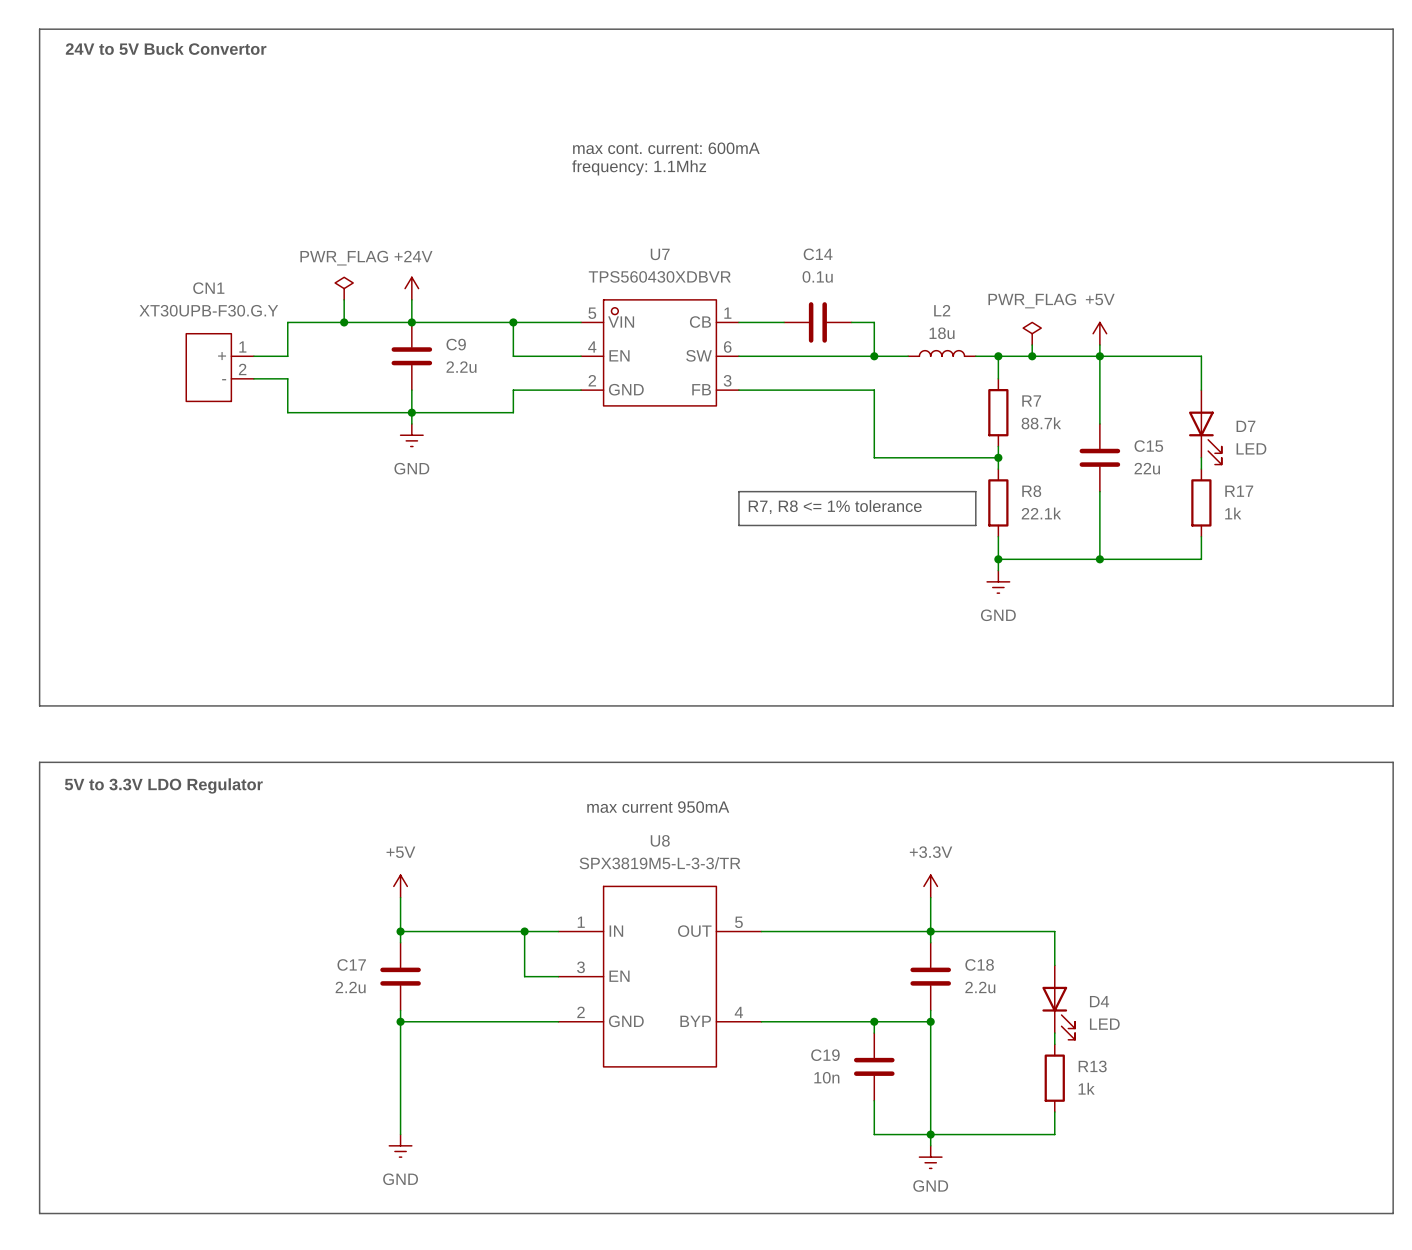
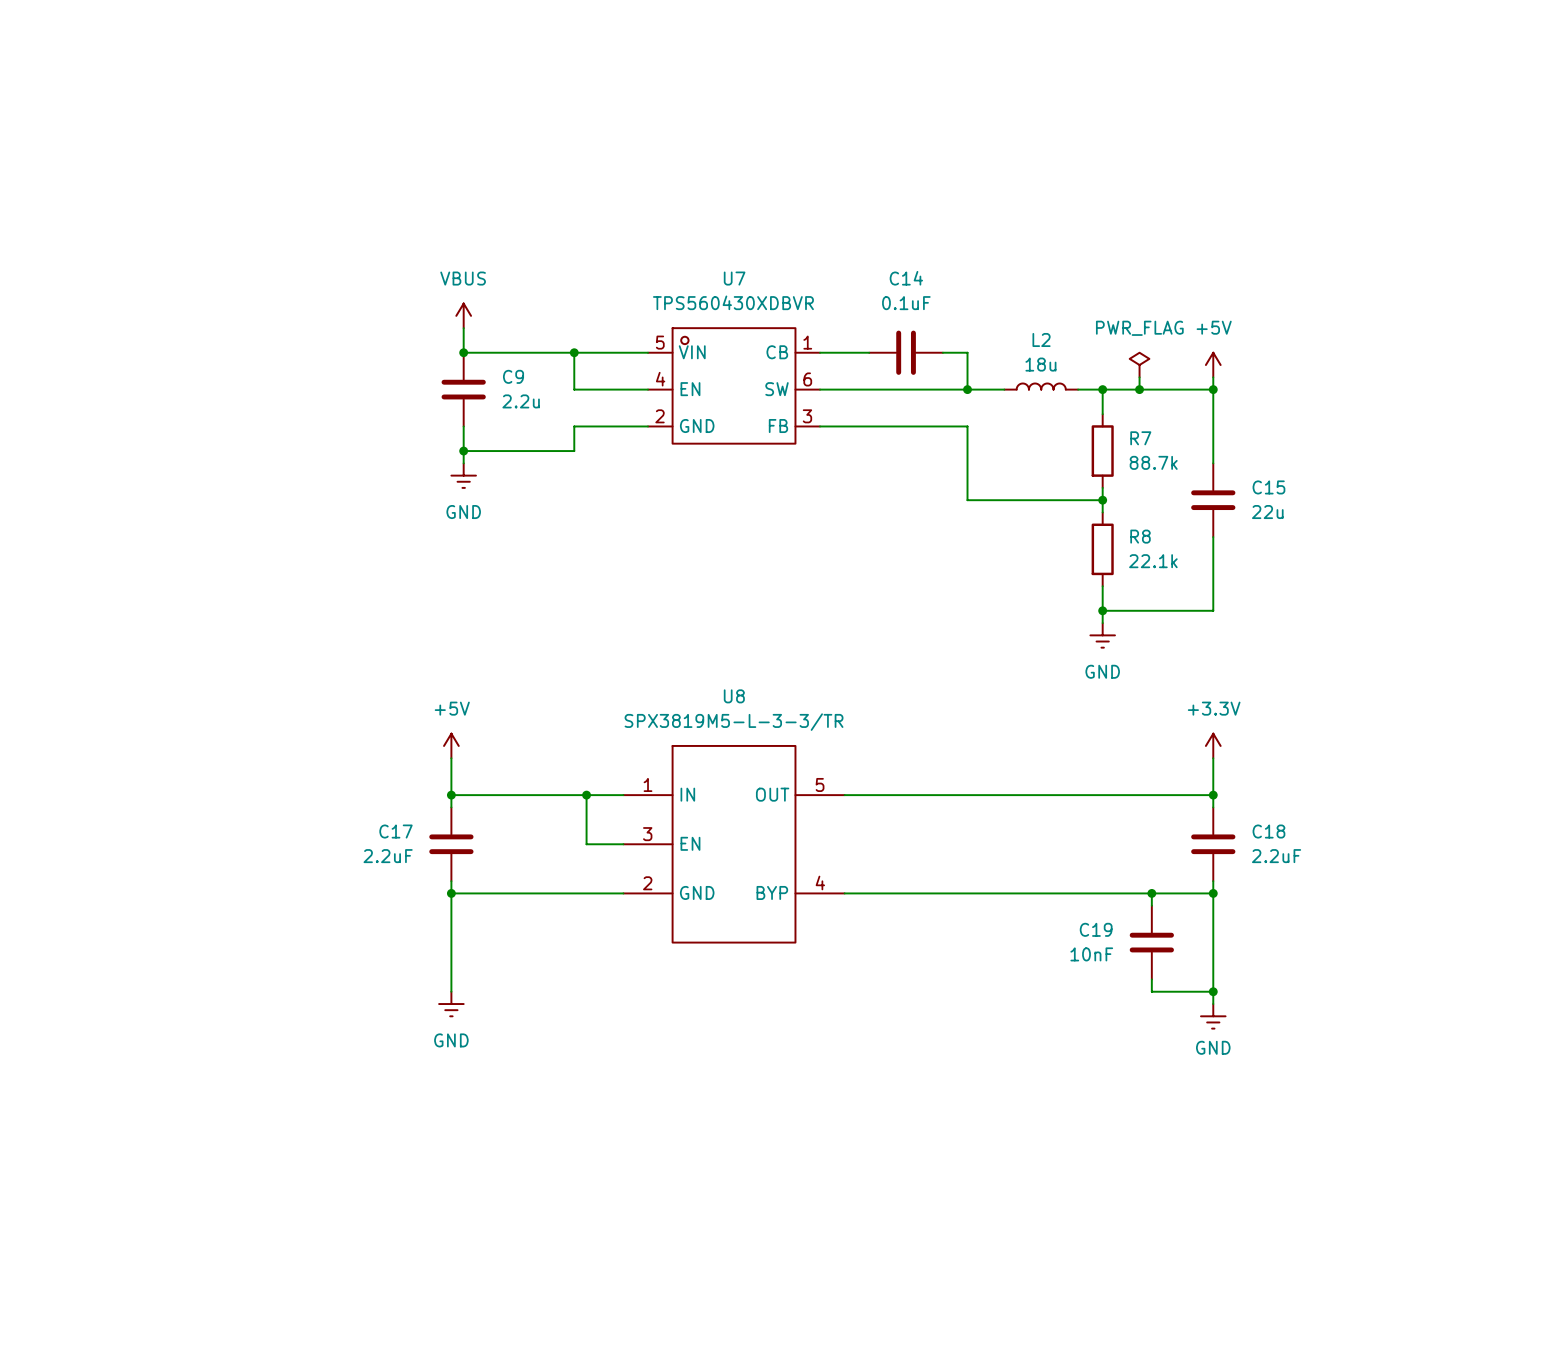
line: (39, 29) (1393, 29) (1393, 705) (39, 705) (39, 29) -> none
text: 24V to 5V Buck Convertor (166, 48) -> none
text: max cont. current: 600mA (666, 148) -> none
text: frequency: 1.1Mhz (639, 167) -> none
C14 value: 0.1u (817, 276) -> 0.1uF (906, 303)
power symbol: PWR_FLAG (344, 288) -> none
power symbol: +24V (411, 288) -> VBUS (463, 315)
wire: (344, 299) (344, 322) -> none
junction: (344, 322) -> none
wire: (411, 322) (287, 322) (287, 356) (253, 356) -> none
wire: (1099, 356) (1201, 356) (1201, 390) -> none
CN1: XT30UPB-F30.G.Y (220, 367) -> none
wire: (253, 378) (287, 378) (287, 412) (411, 412) -> none
D7: LED (1205, 427) -> none
wire: (1201, 457) (1201, 469) -> none
line: (738, 491) (975, 491) (975, 525) (738, 525) (738, 491) -> none
R17: 1k (1201, 502) -> none
text: R7, R8 <= 1% tolerance (835, 507) -> none
wire: (1201, 536) (1201, 559) (1099, 559) -> none
junction: (1099, 559) -> none
power symbol: none -> +3.3V (1213, 745)
wire: none -> (451, 758) (451, 807)
wire: none -> (1213, 758) (1213, 807)
junction: none -> (451, 795)
junction: none -> (586, 795)
wire: none -> (844, 795) (1213, 795)
junction: none -> (1213, 795)
line: (39, 762) (39, 1213) (1393, 1213) (1393, 762) (39, 762) -> none
text: 5V to 3.3V LDO Regulator (163, 785) -> none
wire: none -> (451, 881) (451, 979)
text: max current 950mA (658, 807) -> none
wire: none -> (1213, 881) (1213, 1004)
junction: none -> (451, 893)
wire: none -> (844, 893) (1213, 893)
junction: none -> (1151, 893)
junction: none -> (1213, 893)
power symbol position: +5V (400, 886) -> +5V (451, 745)
power symbol: +3.3V (930, 886) -> none
wire: (930, 897) (930, 942) -> none
wire: none -> (1151, 979) (1151, 991) (1213, 991)
wire: (400, 908) (400, 942) -> none
junction: none -> (1213, 991)
power symbol: none -> GND (451, 1004)
wire: (400, 931) (558, 931) -> (451, 795) (623, 795)
junction: (400, 931) -> none
wire: (524, 931) (524, 976) (558, 976) -> (586, 795) (586, 844) (623, 844)
junction: (524, 931) -> none
wire: (761, 931) (1054, 931) (1054, 965) -> none
junction: (930, 931) -> none
power symbol: none -> GND (1213, 1016)
C17 position: (400, 976) -> (451, 844)
U8 position: (659, 976) -> (734, 844)
C18 position: (930, 976) -> (1213, 844)
C17 value: 2.2u (350, 987) -> 2.2uF (388, 856)
C18 value: 2.2u (980, 987) -> 2.2uF (1276, 856)
D4: LED (1058, 1002) -> none
wire: (400, 1010) (400, 1134) -> none
wire: (930, 1010) (930, 1145) -> none
wire: (400, 1021) (558, 1021) -> (451, 893) (623, 893)
junction: (400, 1021) -> none
wire: (761, 1021) (930, 1021) -> none
wire: (874, 1021) (874, 1033) -> none
junction: (874, 1021) -> none
junction: (930, 1021) -> none
wire: (1054, 1033) (1054, 1044) -> (1151, 893) (1151, 905)
C19 position: (874, 1066) -> (1151, 942)
C19 value: 10n (826, 1077) -> 10nF (1091, 954)
R13: 1k (1054, 1078) -> none
wire: (874, 1100) (874, 1134) (1054, 1134) (1054, 1112) -> none
junction: (930, 1134) -> none
power symbol: GND (400, 1145) -> none
power symbol: GND (930, 1157) -> none

